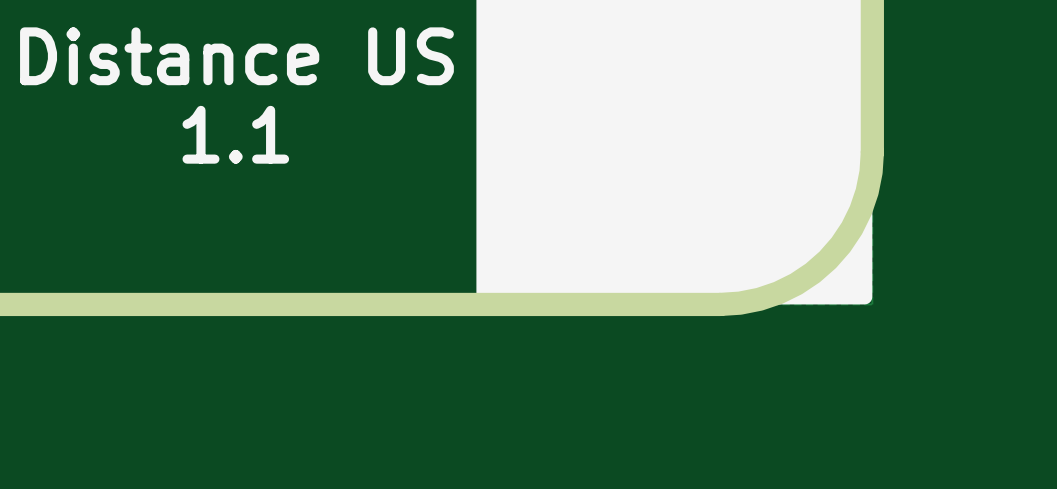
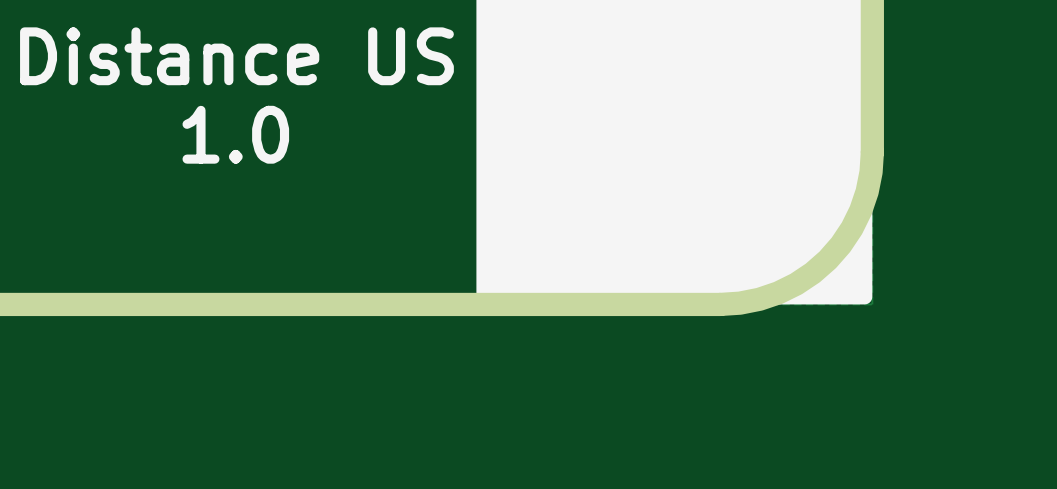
text: 1.1 (235, 134) -> 1.0 (235, 134)

